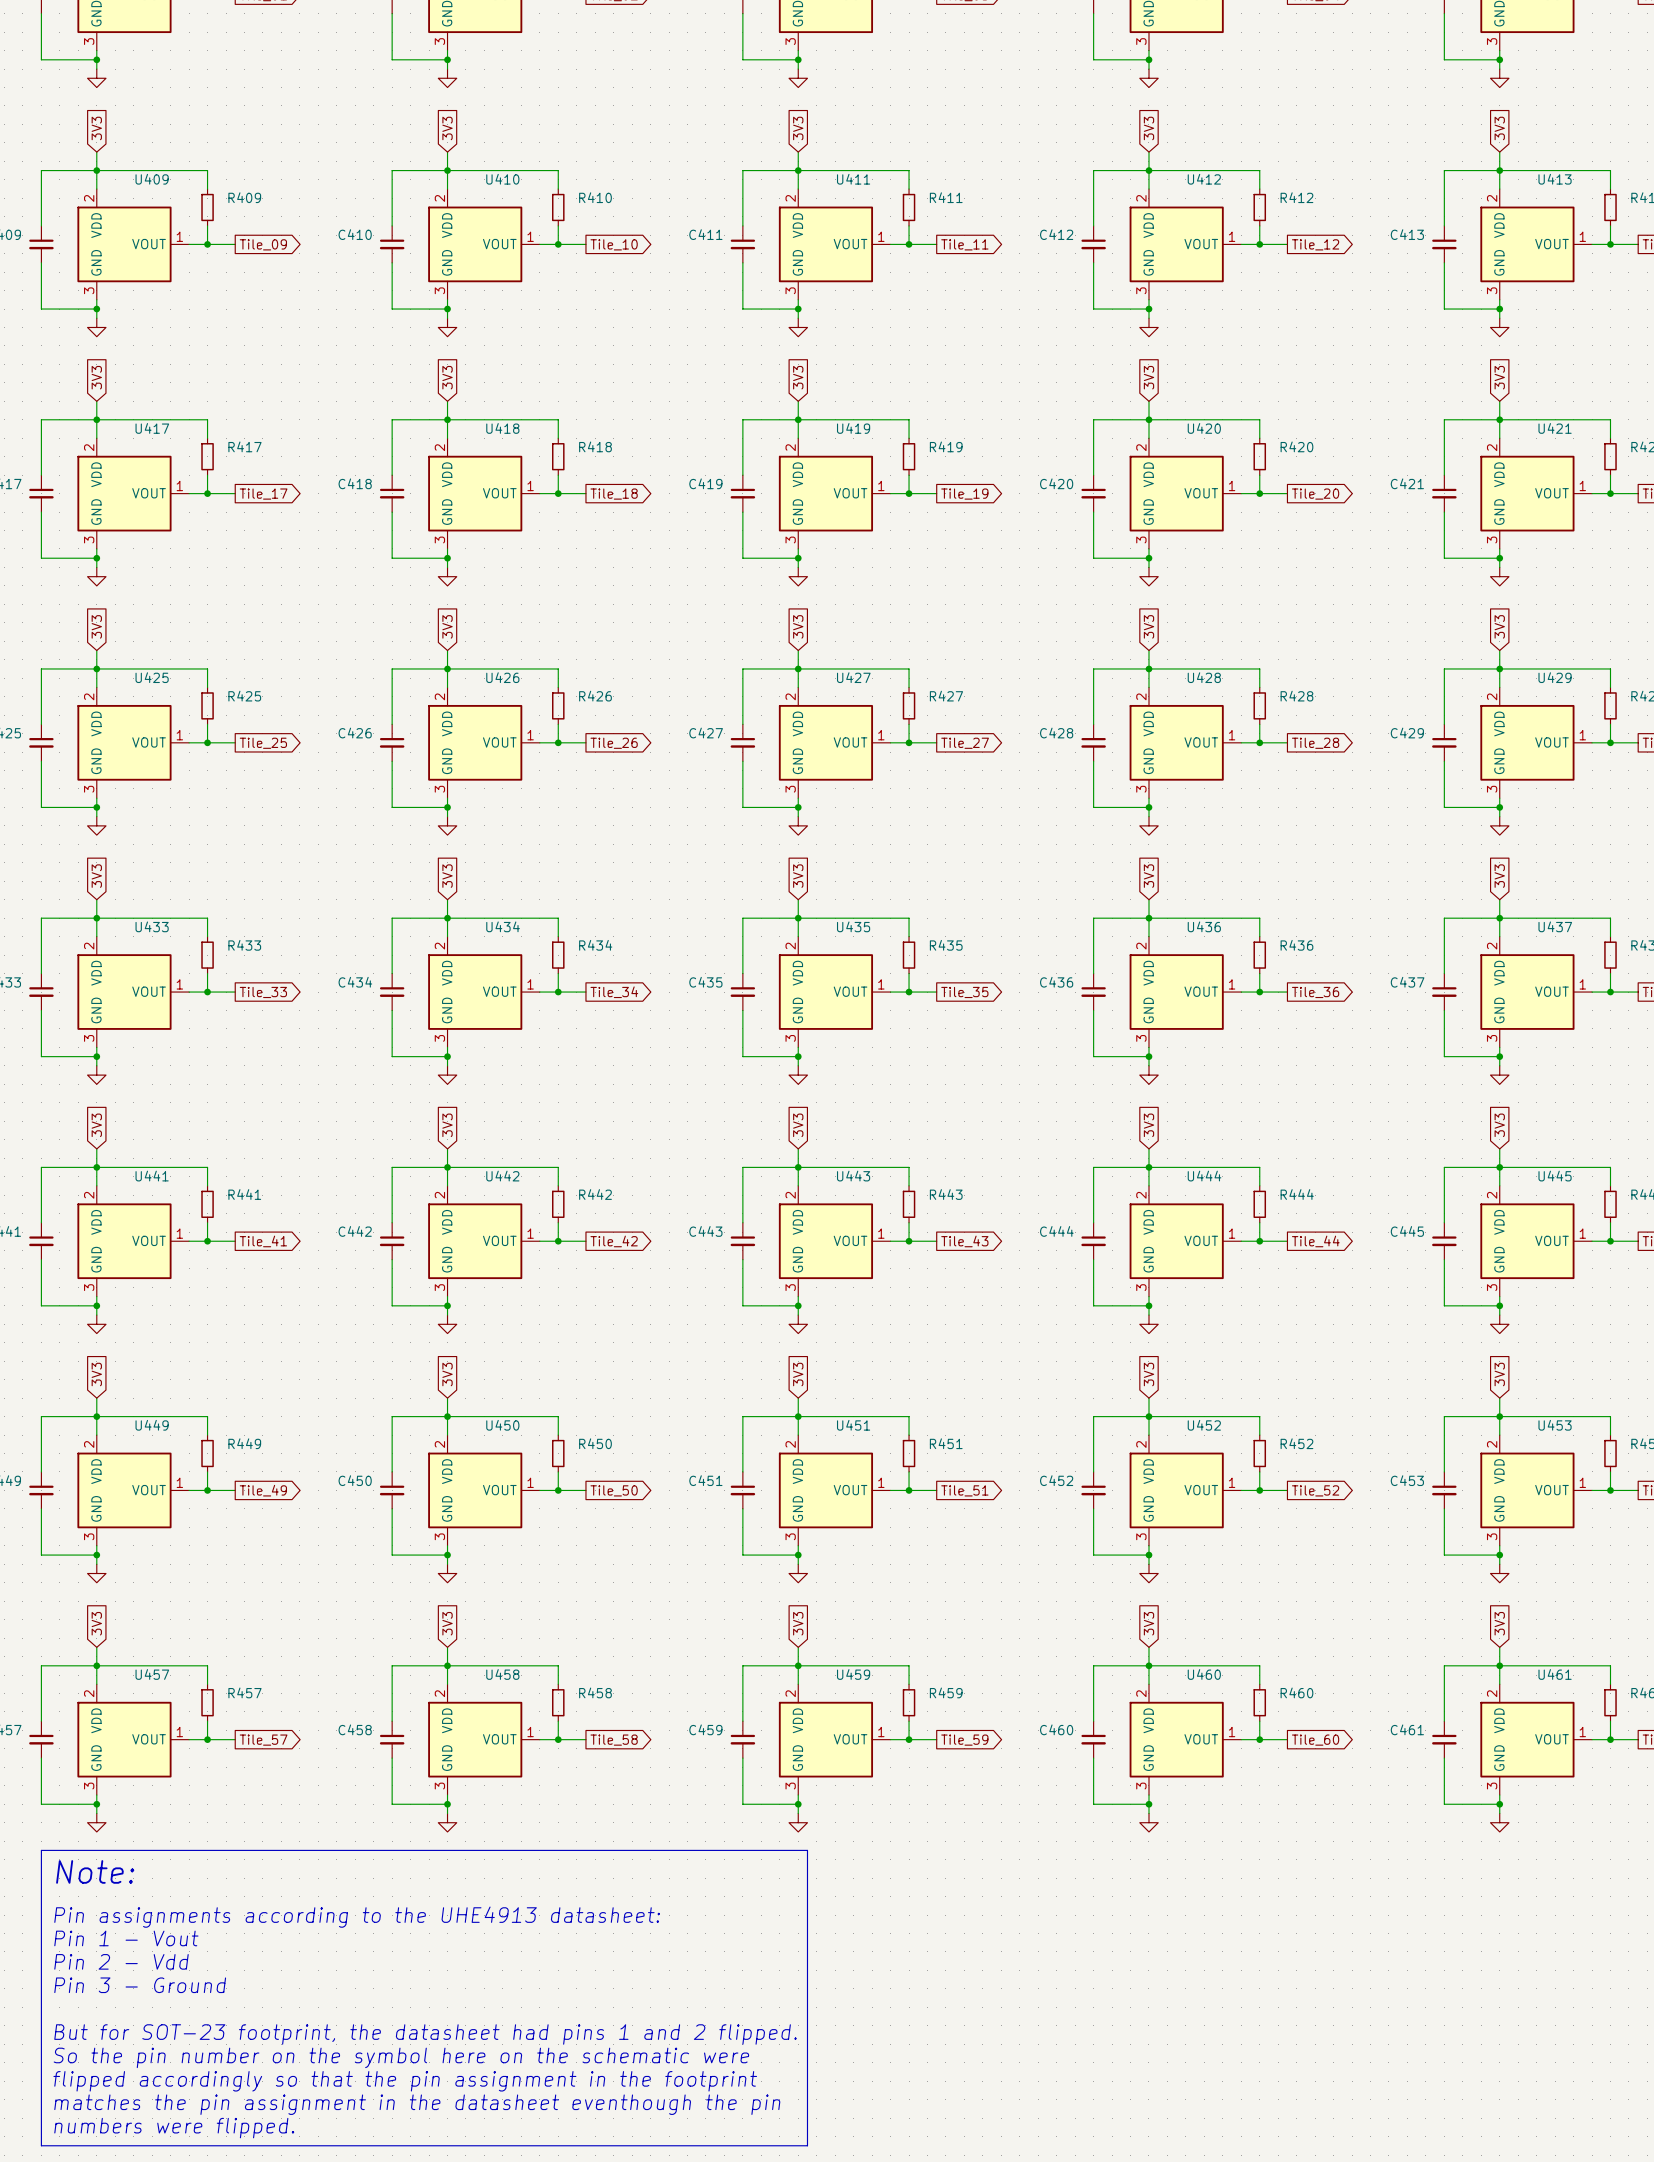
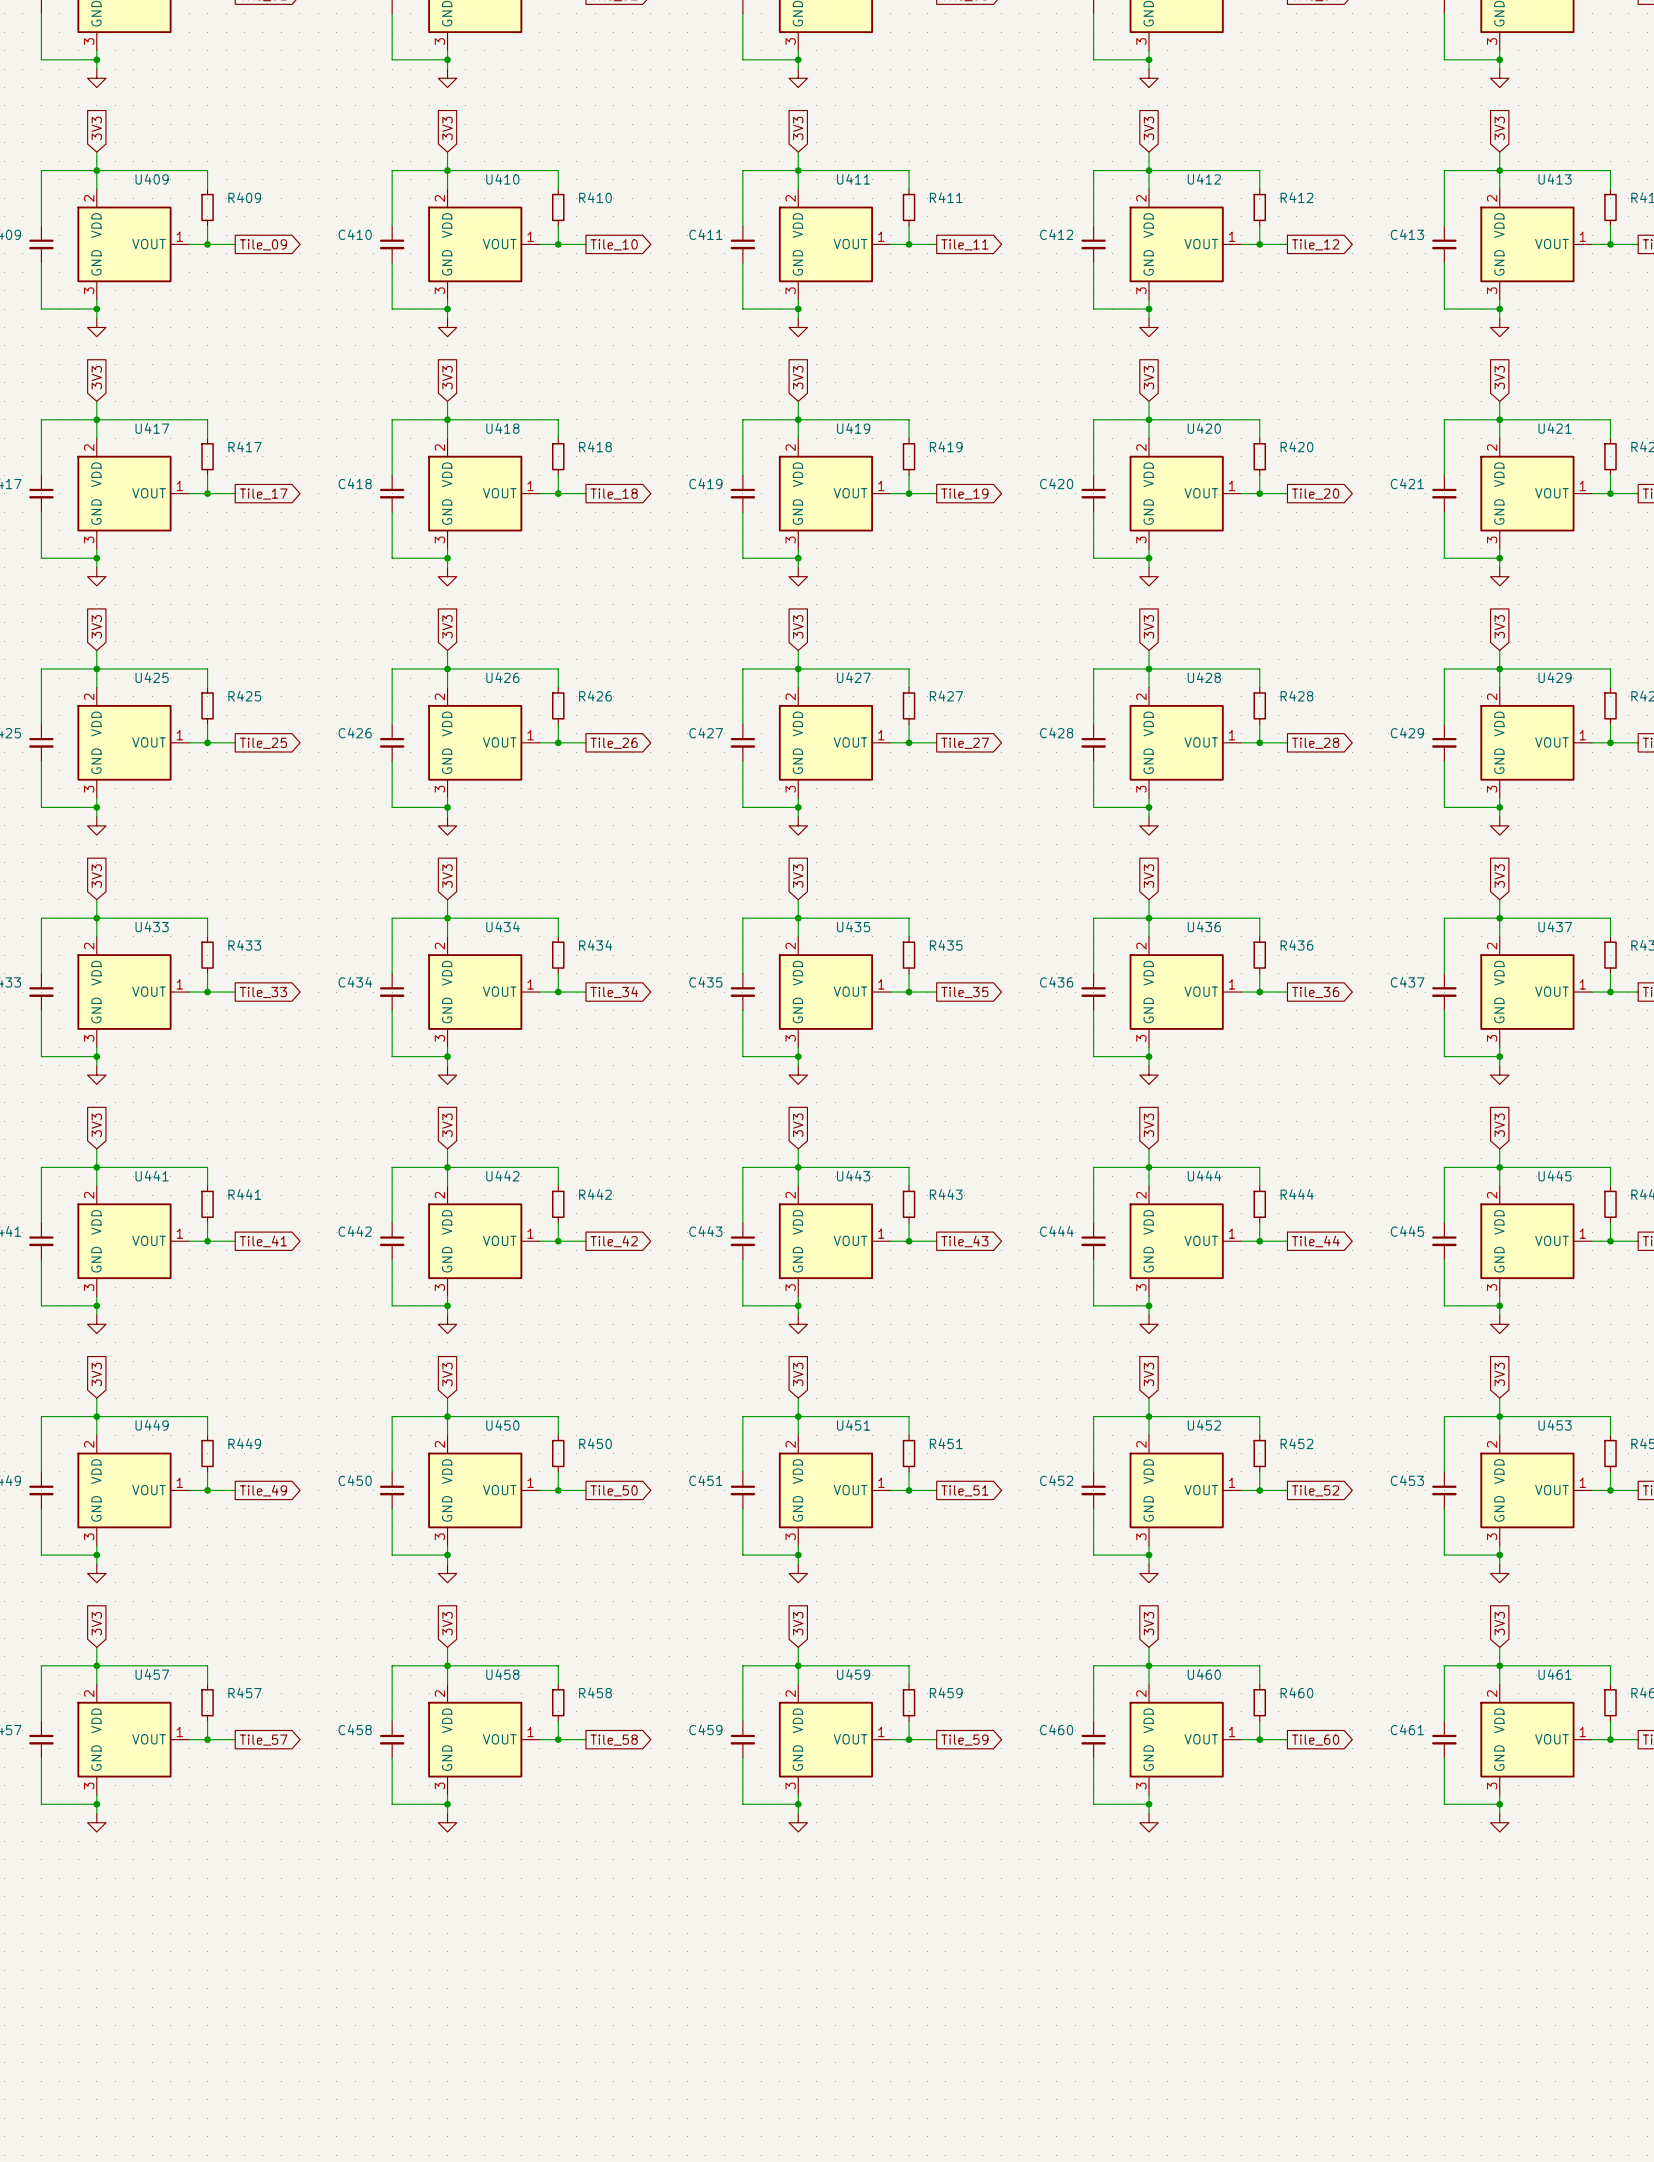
line: (41, 1850) (41, 2145) (807, 2145) (807, 1850) (41, 1850) -> none
text: Note: (95, 1871) -> none
text: Pin assignments according to the UHE4913 datasheet: (357, 1917) -> none
text: Pin 1 - Vout (126, 1938) -> none
text: Pin 2 - Vdd (121, 1961) -> none
text: Pin 3 - Ground (140, 1985) -> none
text: But for SOT-23 footprint, the datasheet had pins 1 and 2 flipped. (425, 2034) -> none
text: So the pin number on the symbol here on the schematic were (401, 2057) -> none
text: flipped accordingly so that the pin assignment in the footprint (405, 2081) -> none
text: matches the pin assignment in the datasheet eventhough the pin (417, 2104) -> none
text: numbers were flipped. (174, 2128) -> none

